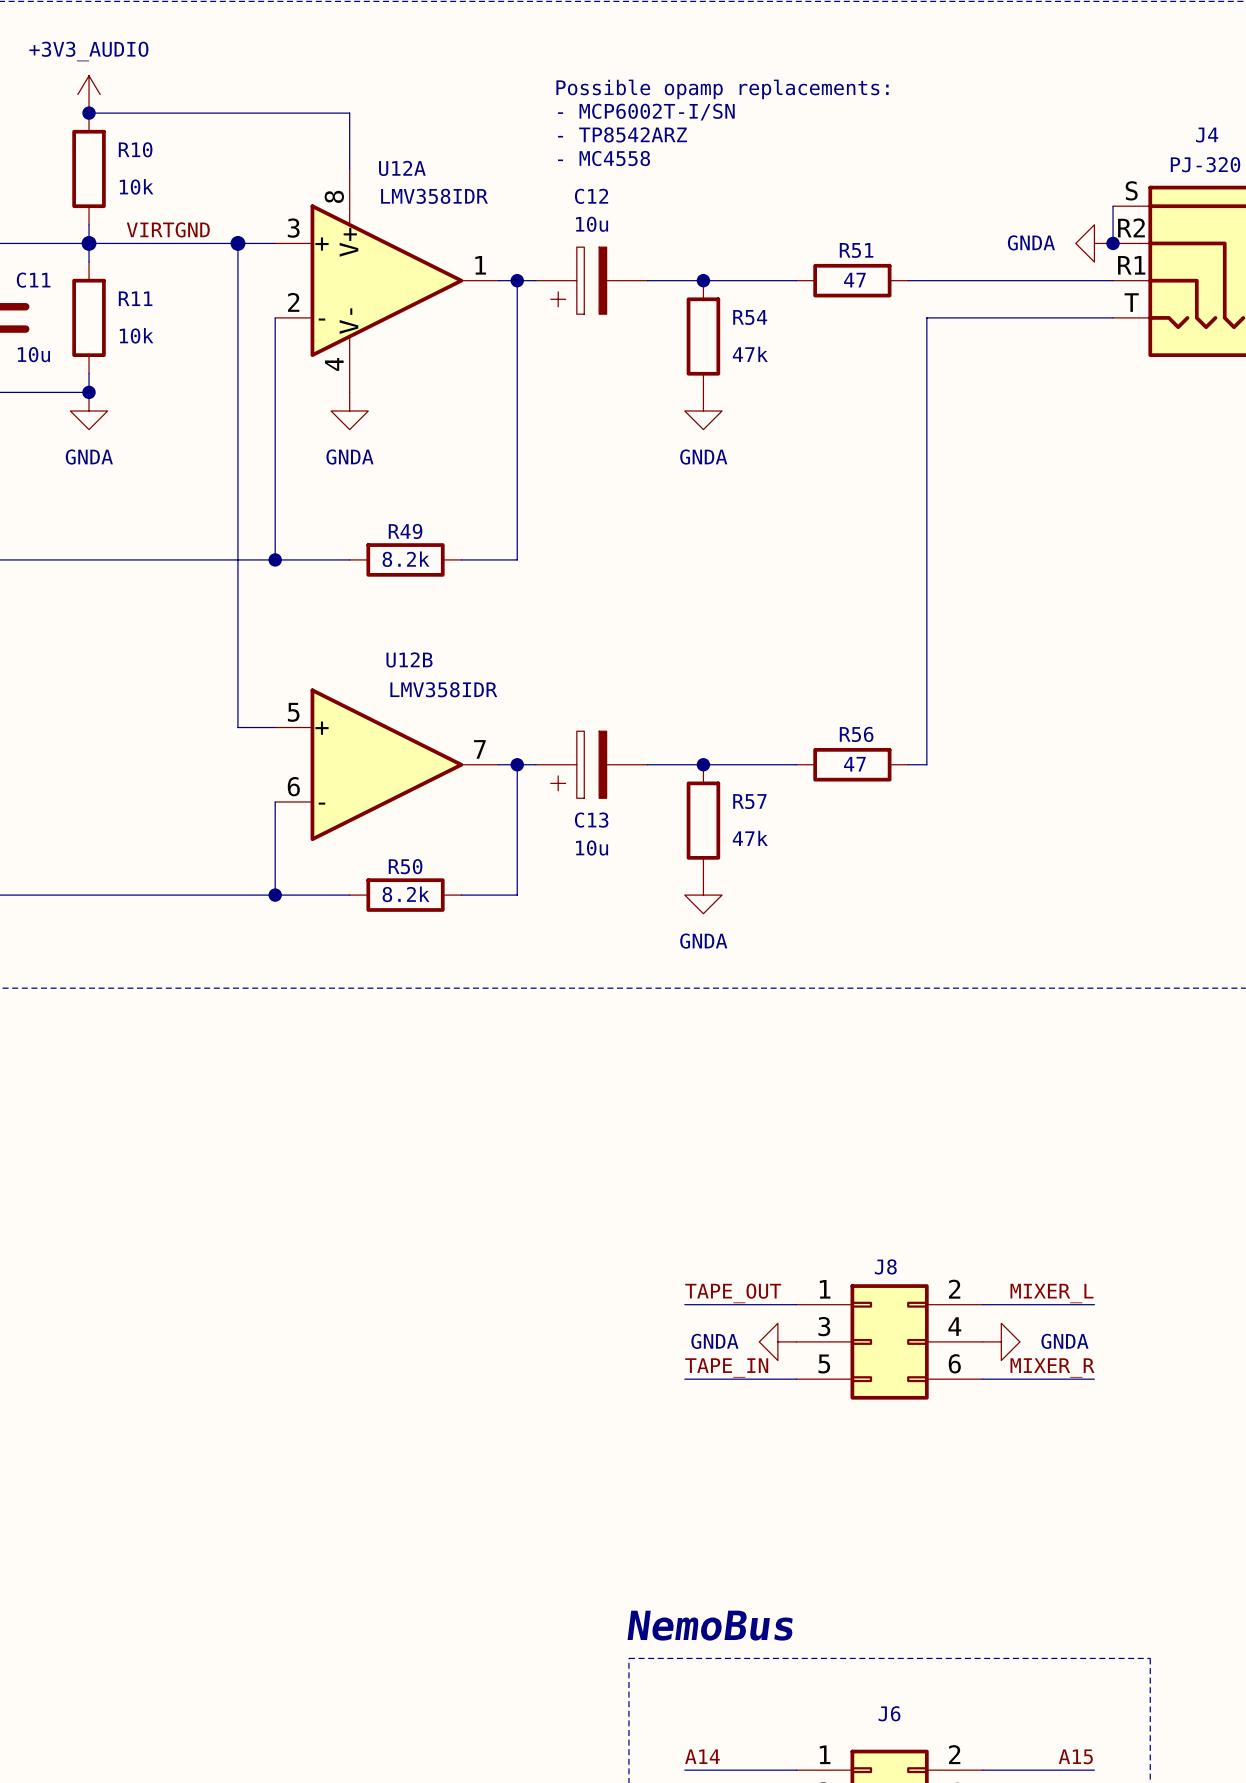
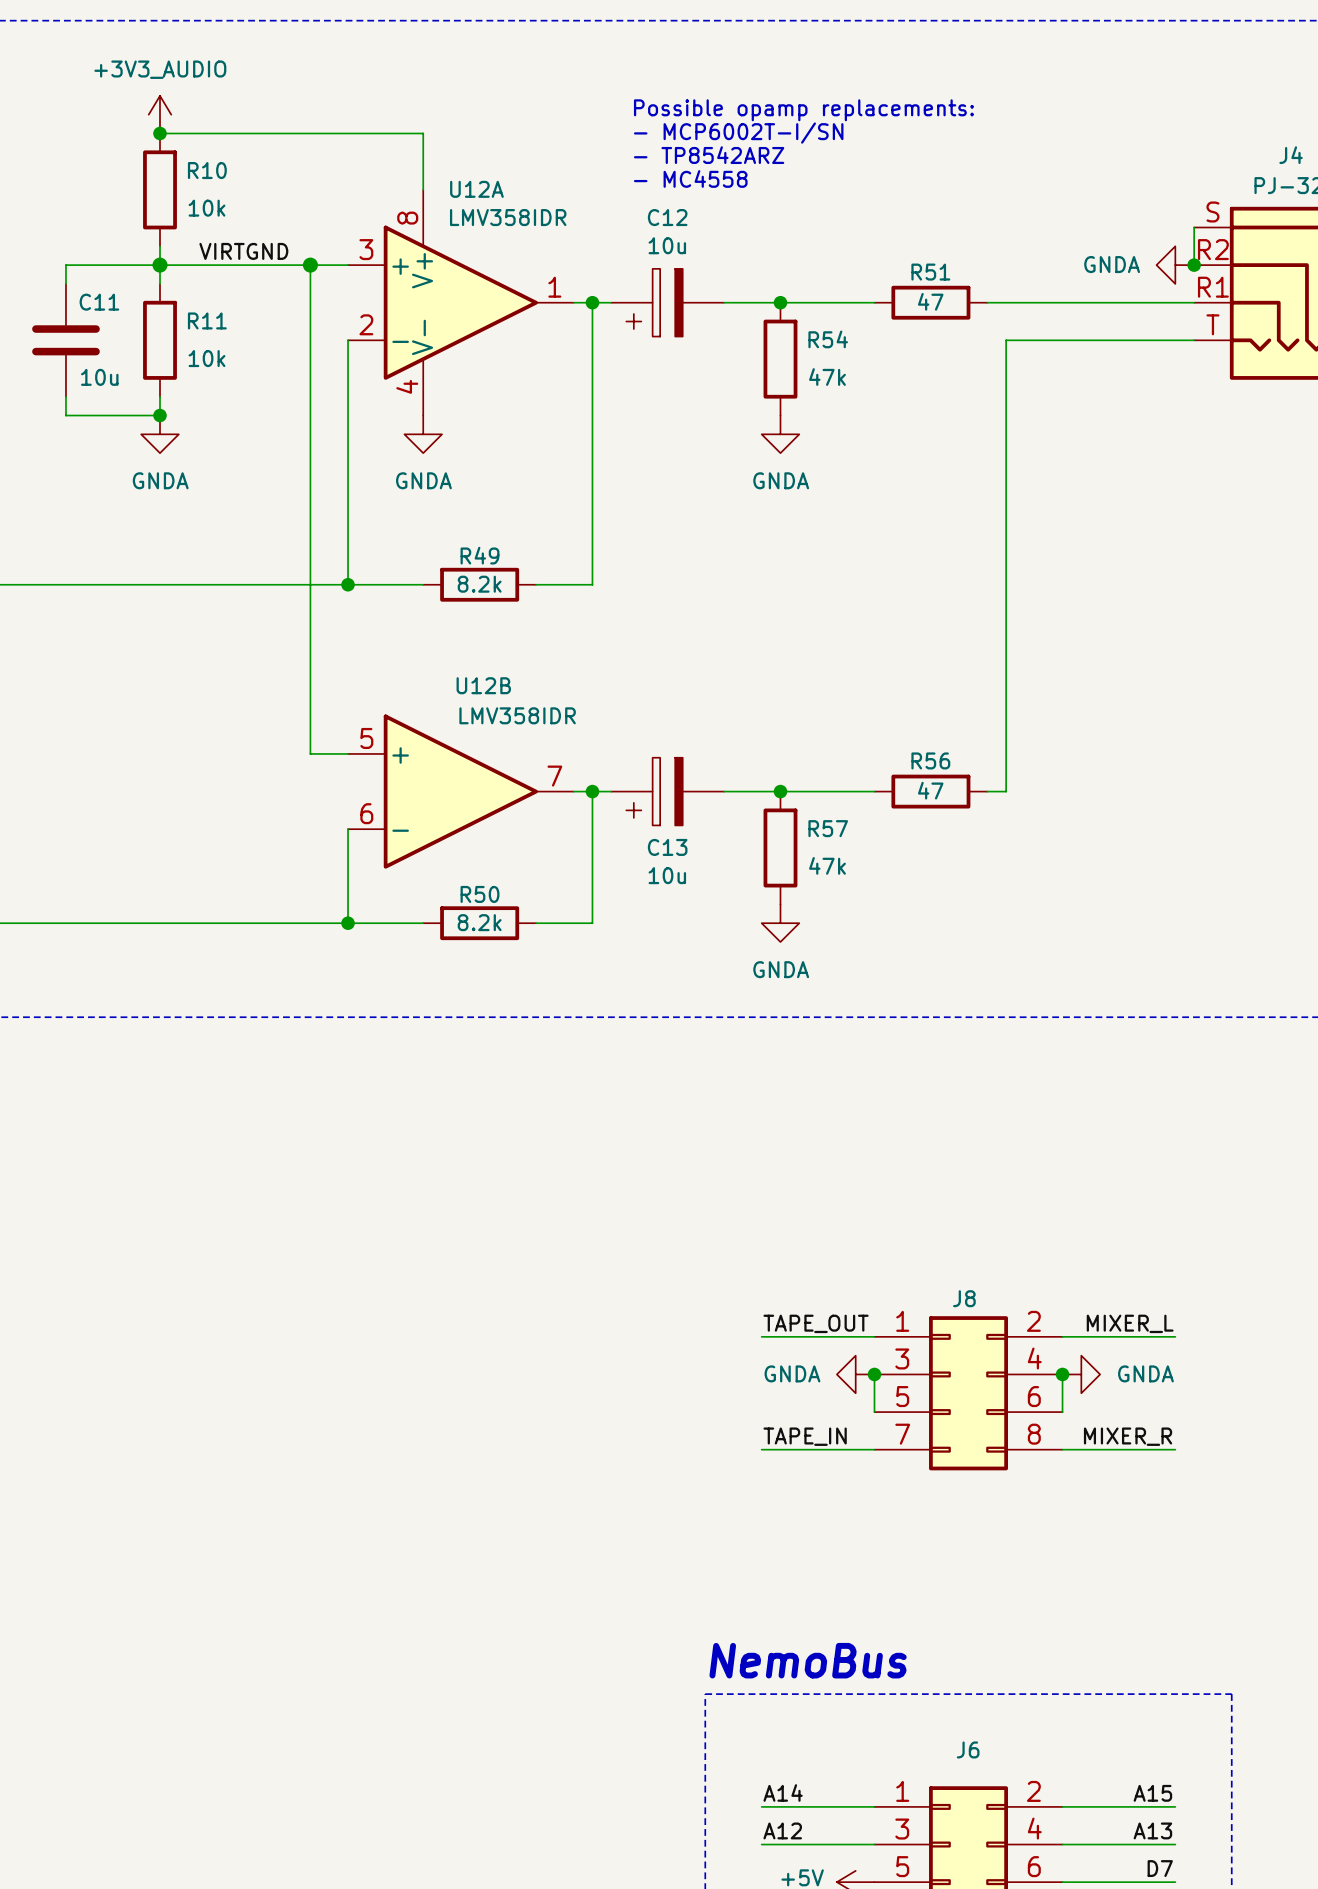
J8 symbol: [796, 1284, 983, 1400] -> [874, 1316, 1063, 1471]
junction: none -> (874, 1374)
junction: none -> (1062, 1374)
label position: TAPE_IN (726, 1367) -> TAPE_IN (805, 1436)
label position: MIXER_R (1052, 1367) -> MIXER_R (1128, 1436)
wire: (684, 1379) (796, 1379) -> (874, 1374) (874, 1412)
wire: (982, 1379) (1094, 1379) -> (1062, 1412) (1062, 1374)
wire: none -> (761, 1449) (874, 1449)
wire: none -> (1062, 1449) (1175, 1449)

